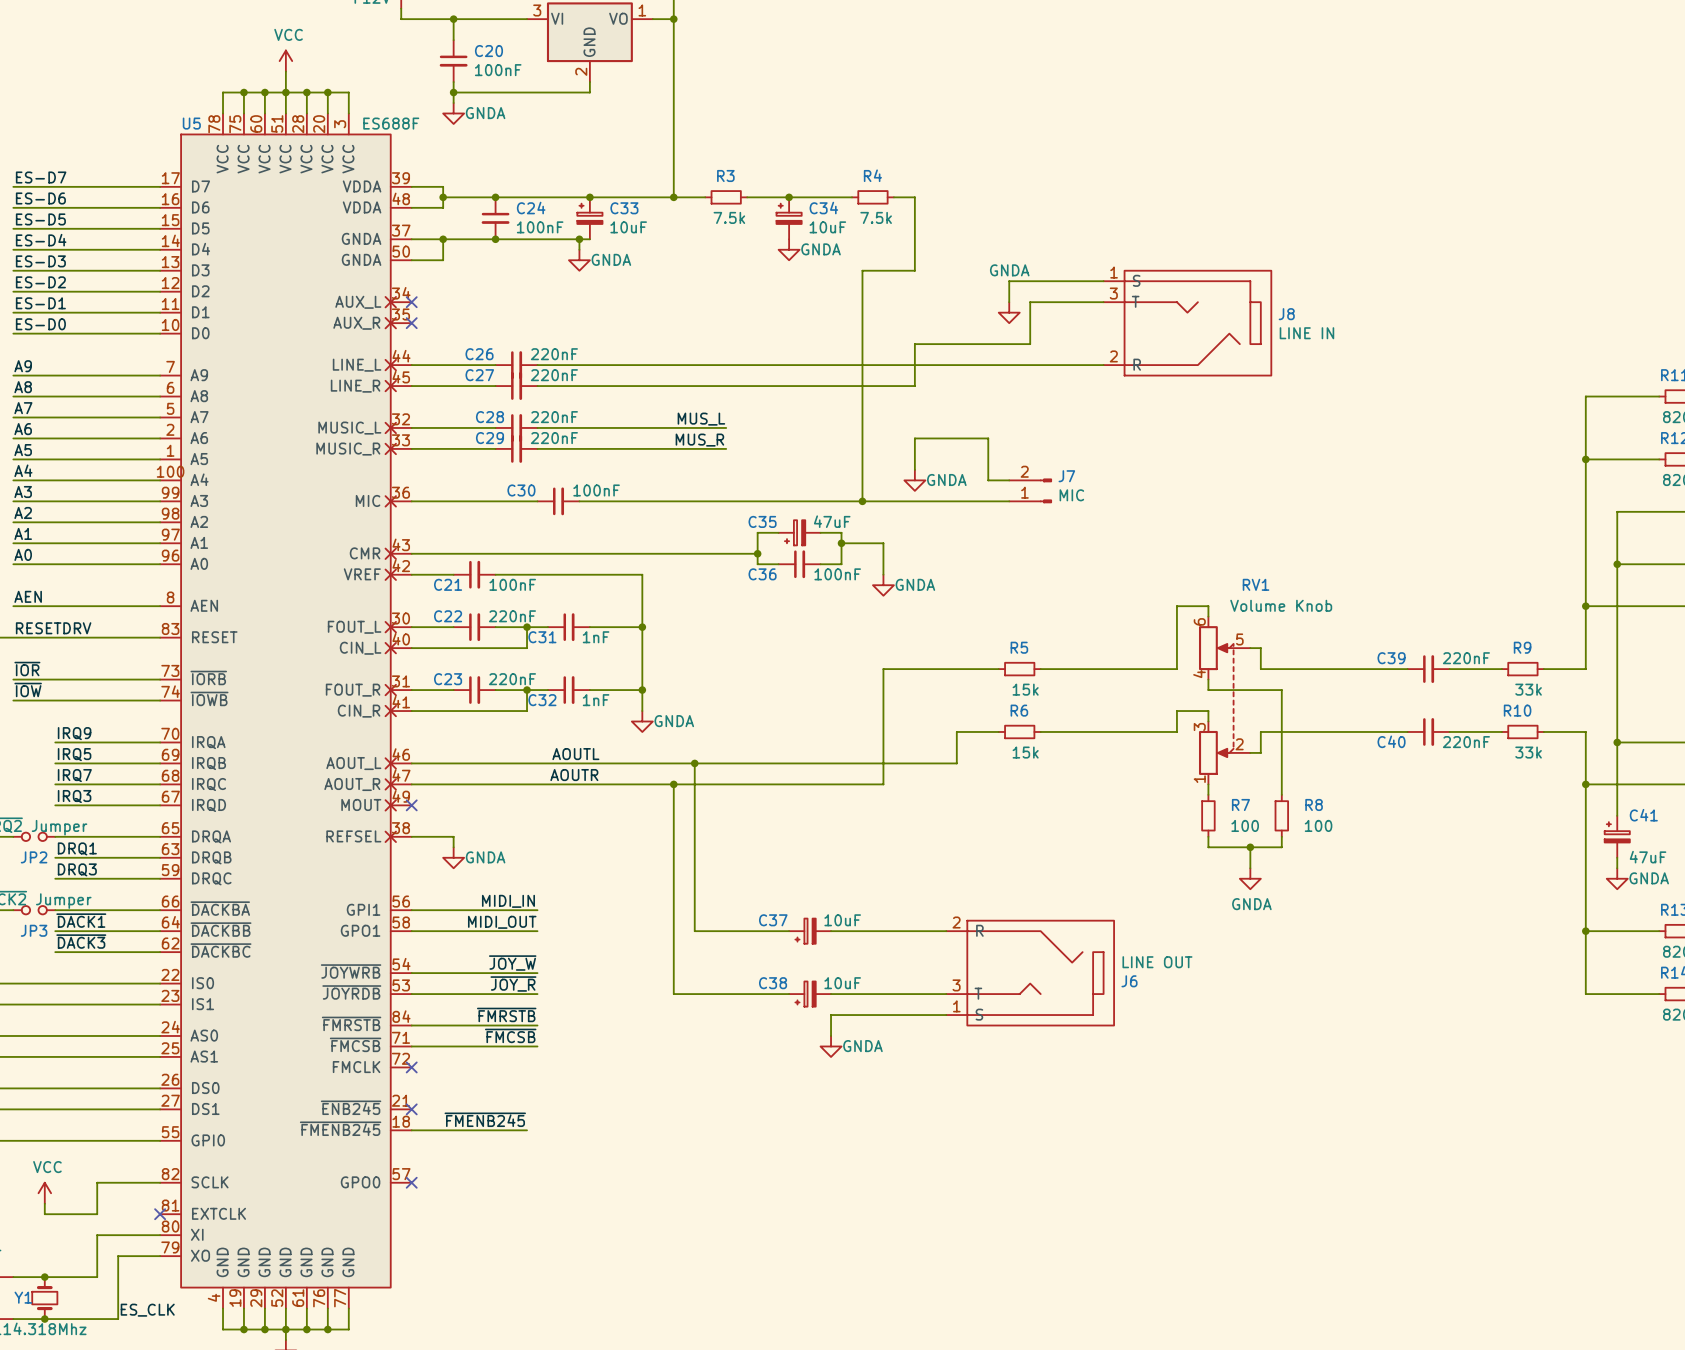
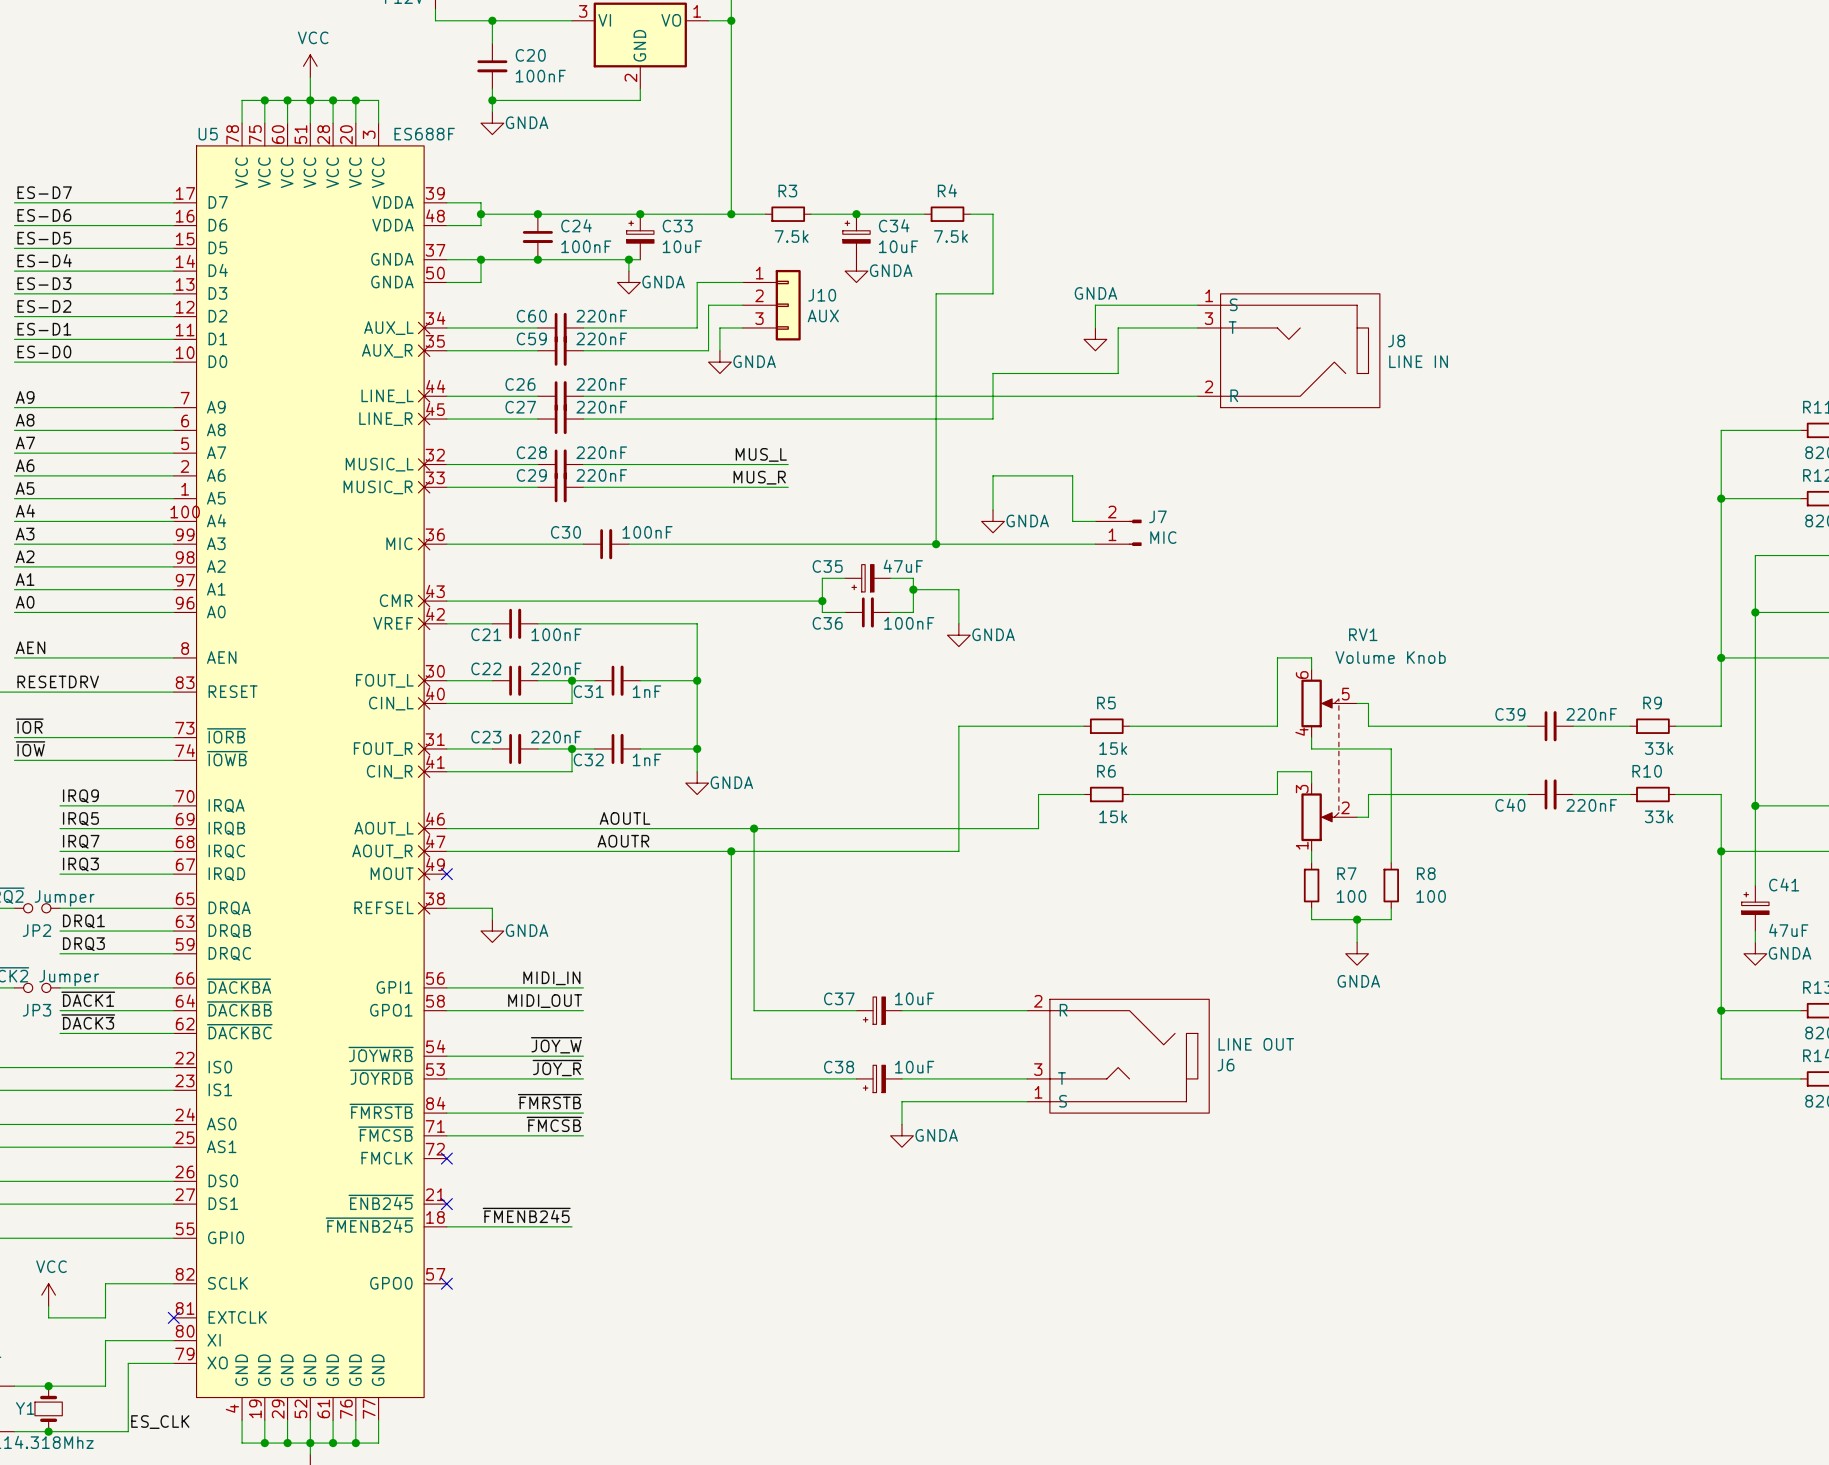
wire: none -> (742, 282) (697, 282) (697, 327) (583, 327)
wire: none -> (742, 305) (708, 305) (708, 350) (583, 350)
J10: none -> AUX (771, 305)
wire: none -> (446, 327) (537, 327)
no-connect mark: (411, 302) -> none
C60: none -> 220nF (560, 327)
wire: none -> (742, 327) (719, 327) (719, 350)
wire: none -> (446, 350) (537, 350)
no-connect mark: (411, 323) -> none
C59: none -> 220nF (560, 350)
power symbol: none -> GNDA (719, 362)

